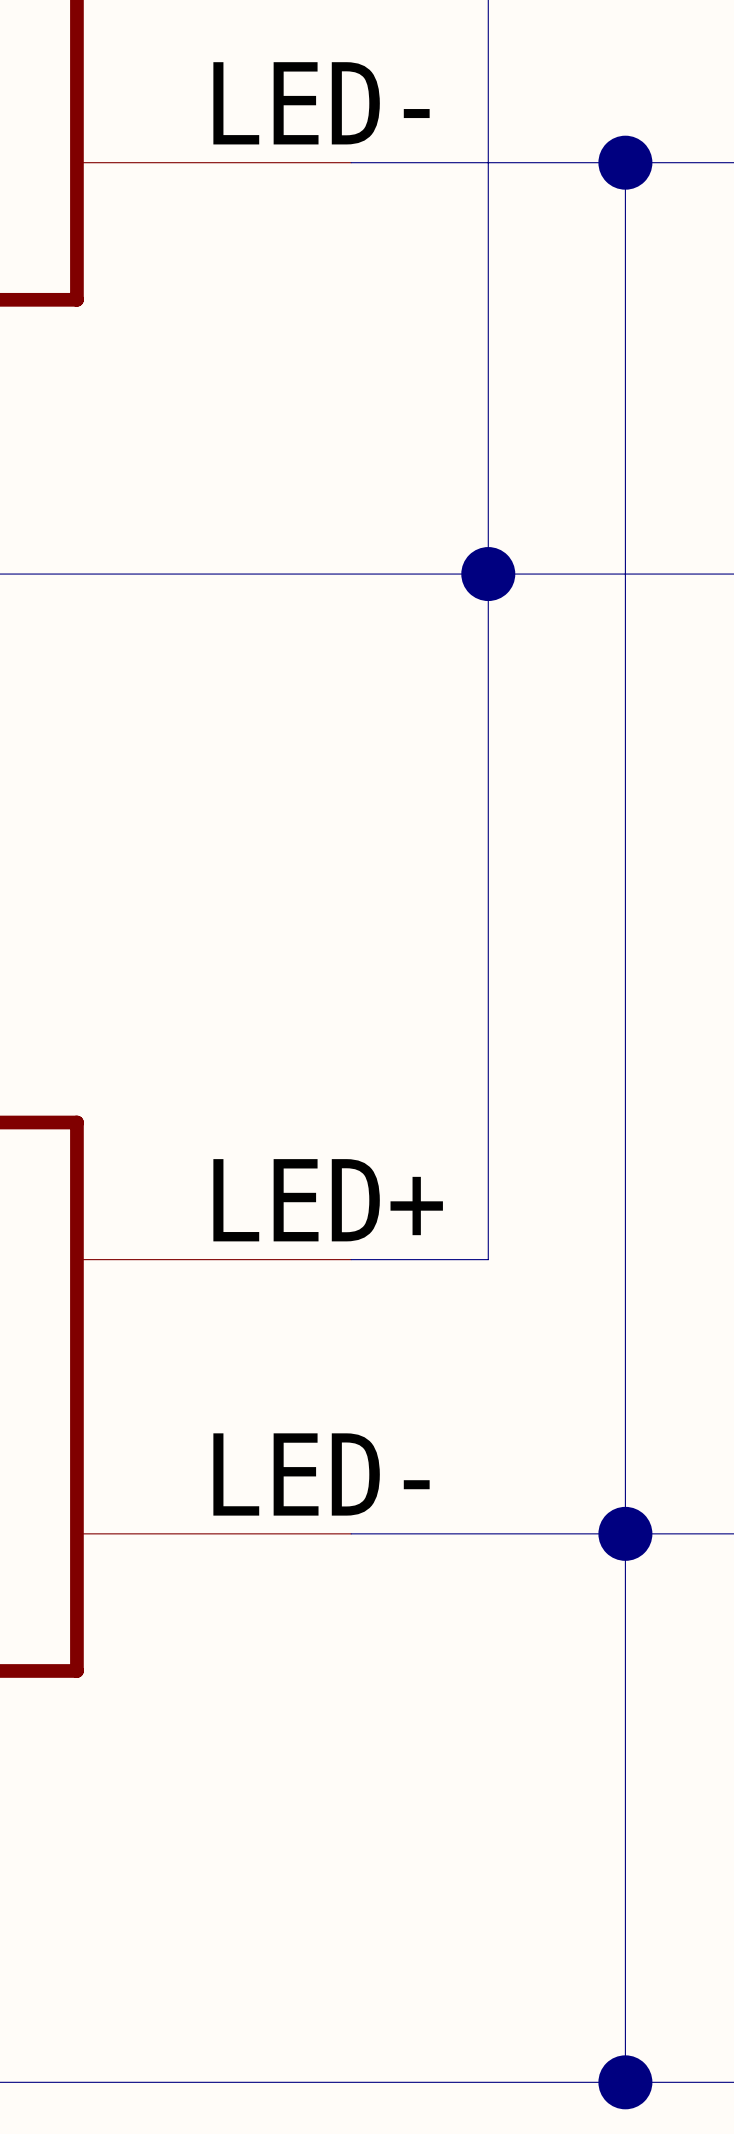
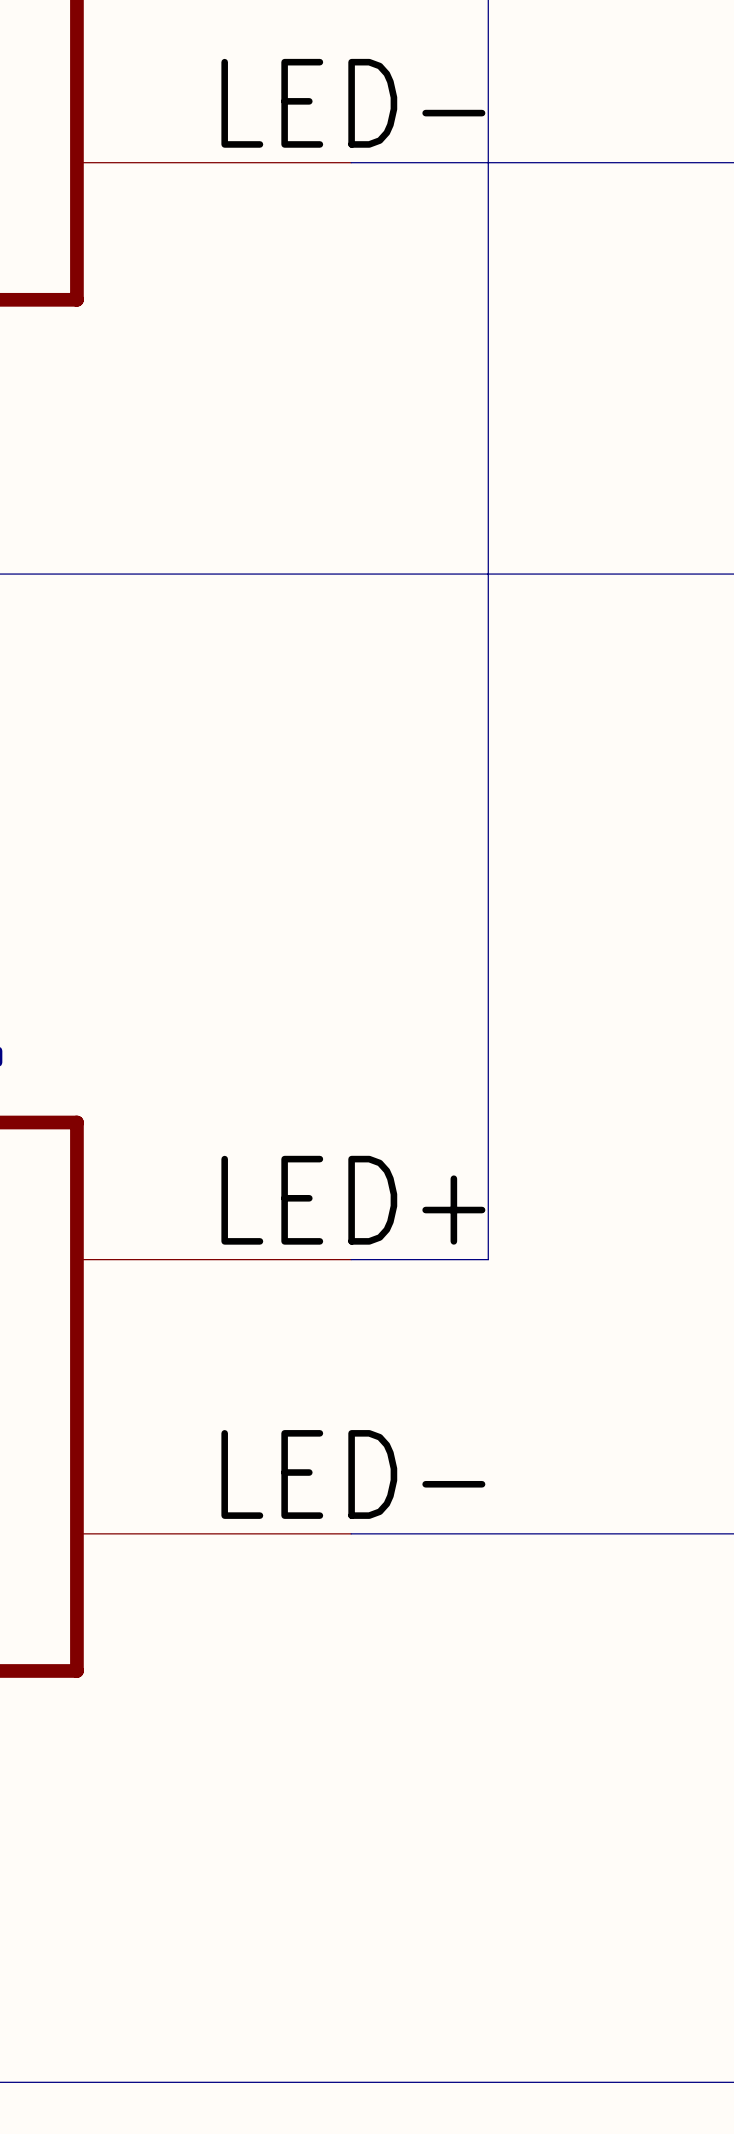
wire: (625, 162) (625, 2082) -> none
junction: (625, 162) -> none
junction: (488, 574) -> none
junction: (625, 1533) -> none
junction: (625, 2082) -> none

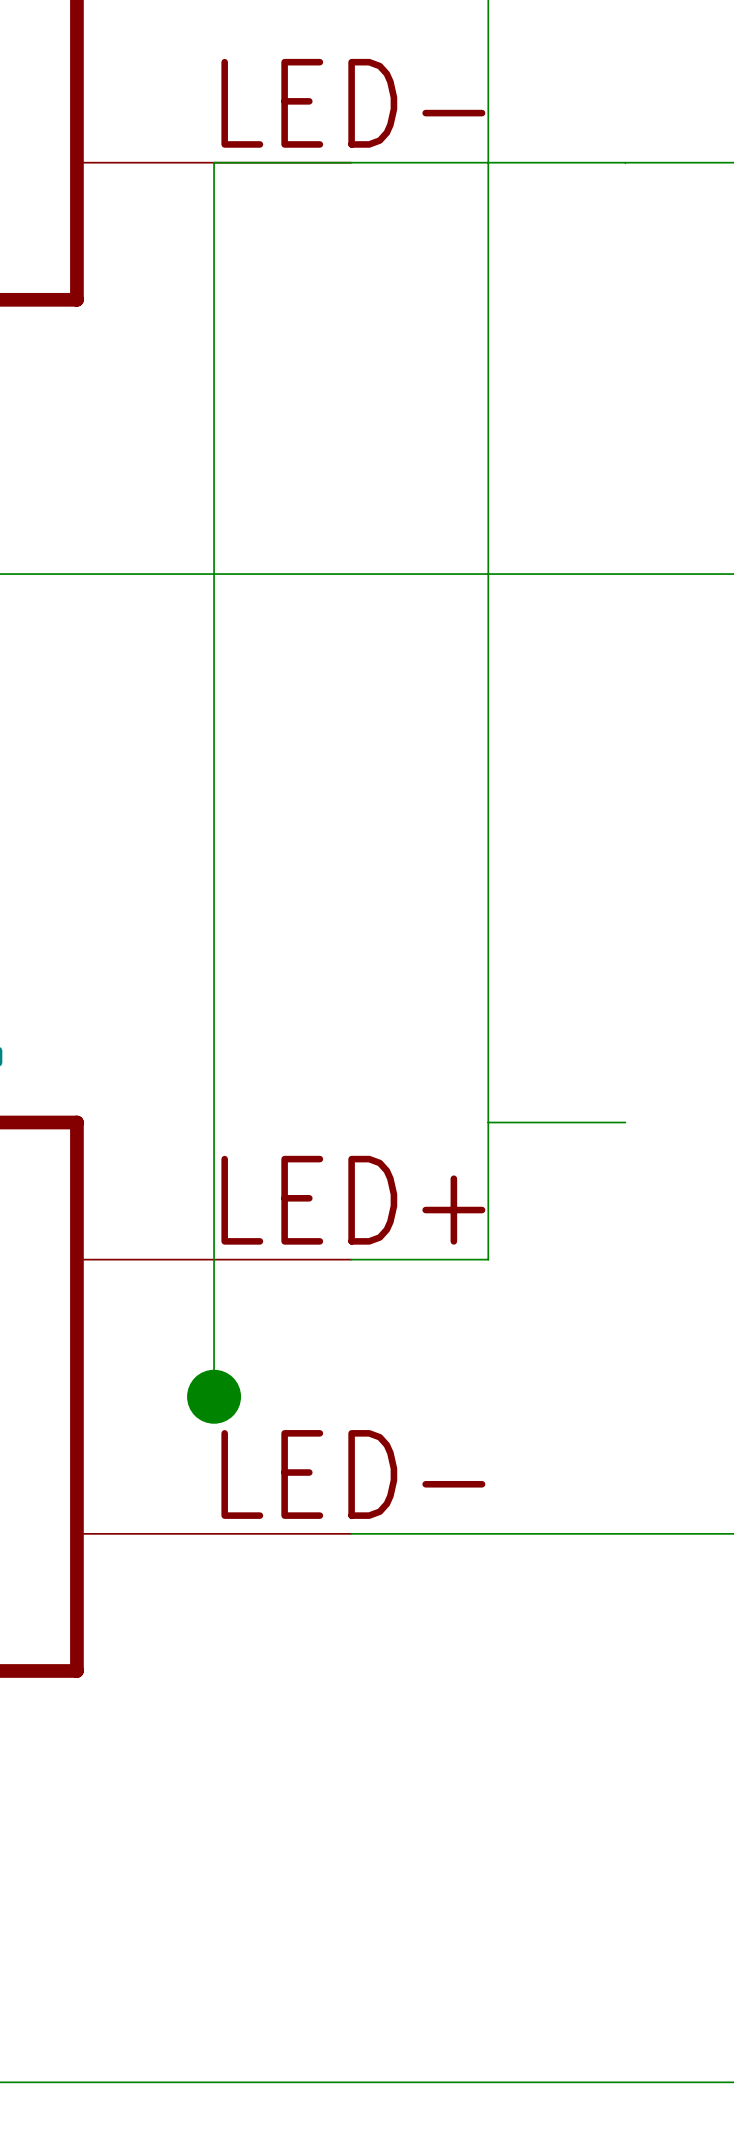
wire: none -> (351, 162) (214, 162) (214, 1396)
wire: none -> (488, 1122) (625, 1122)
junction: none -> (214, 1396)

